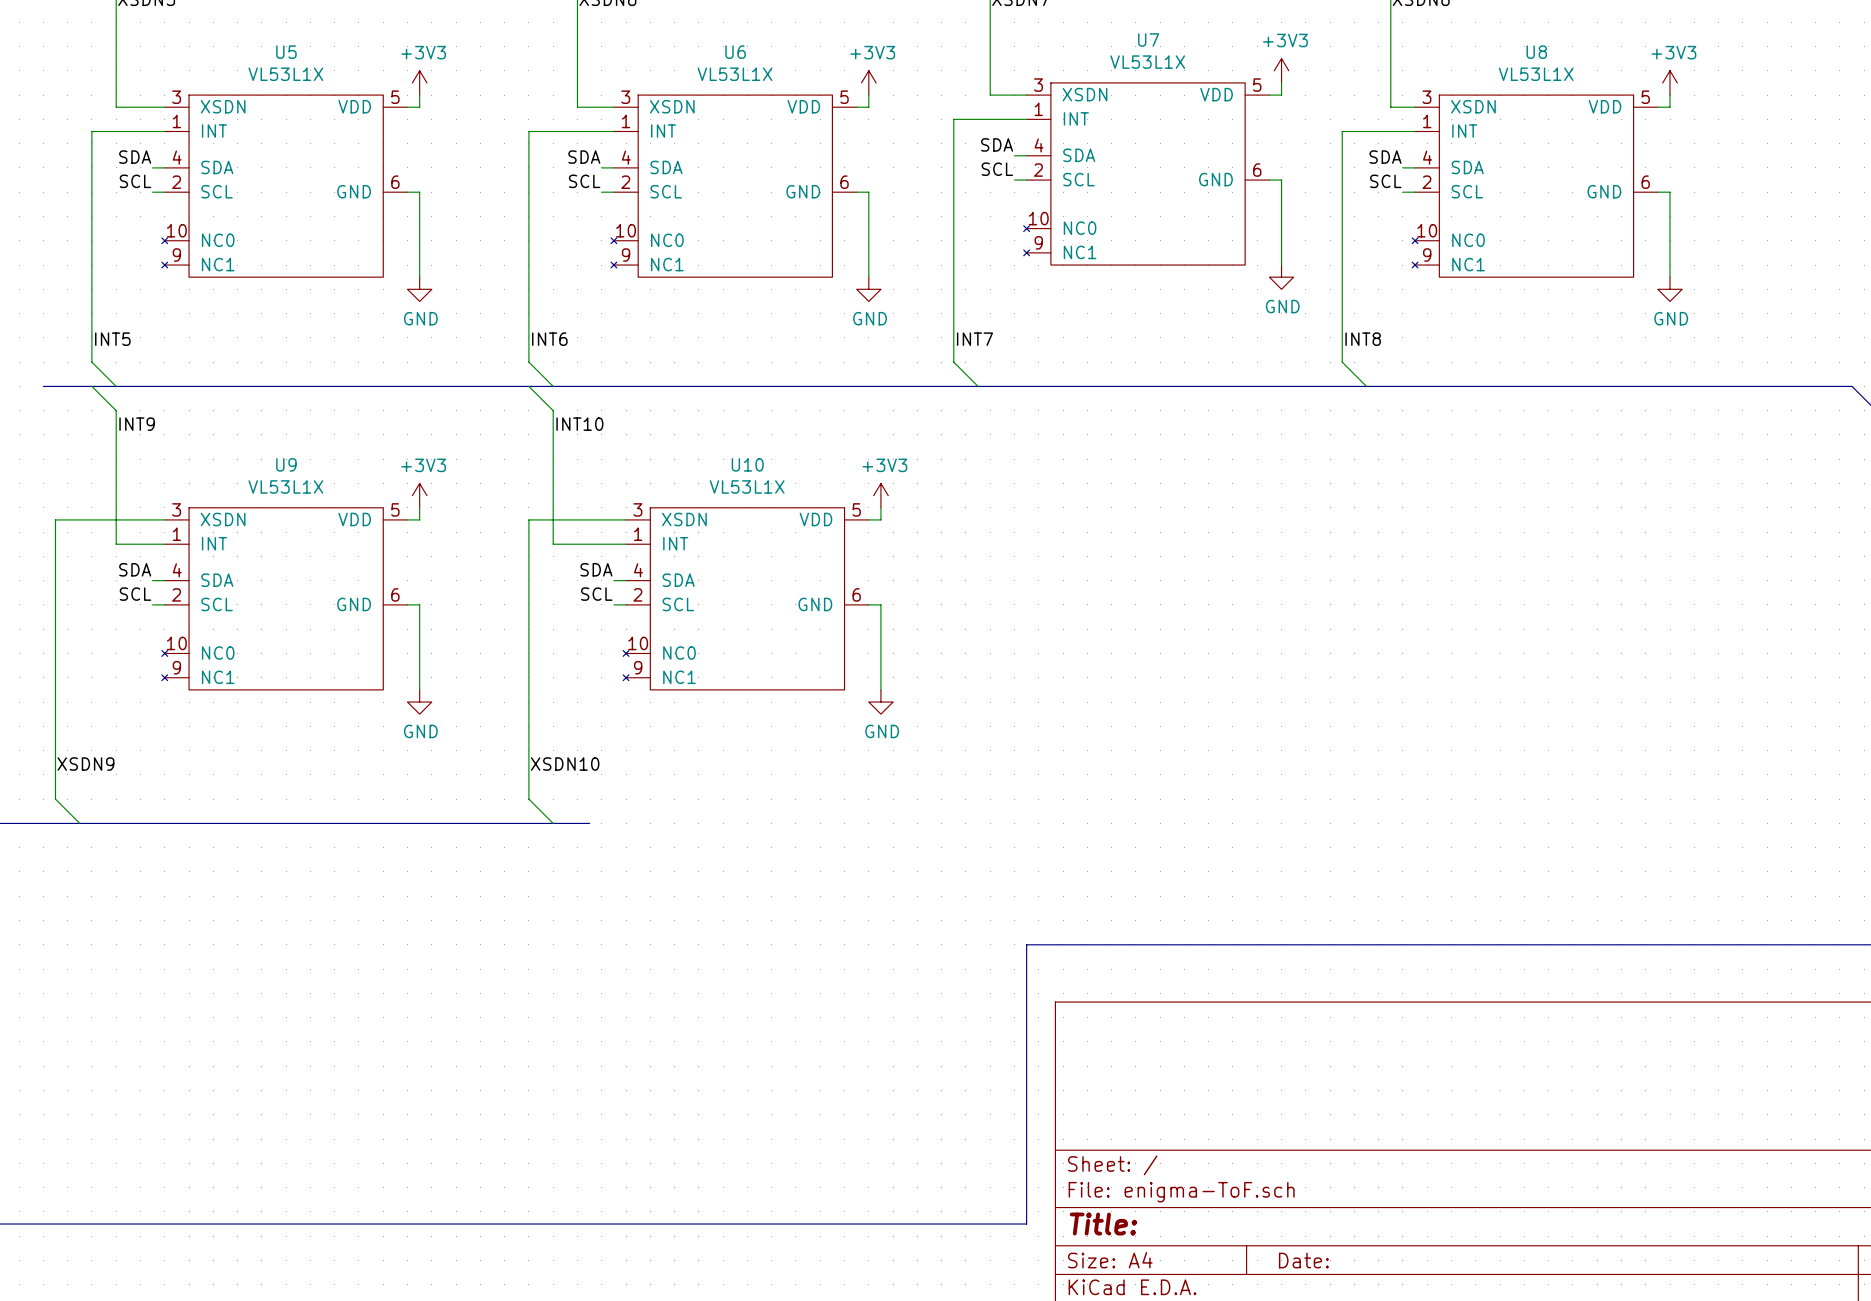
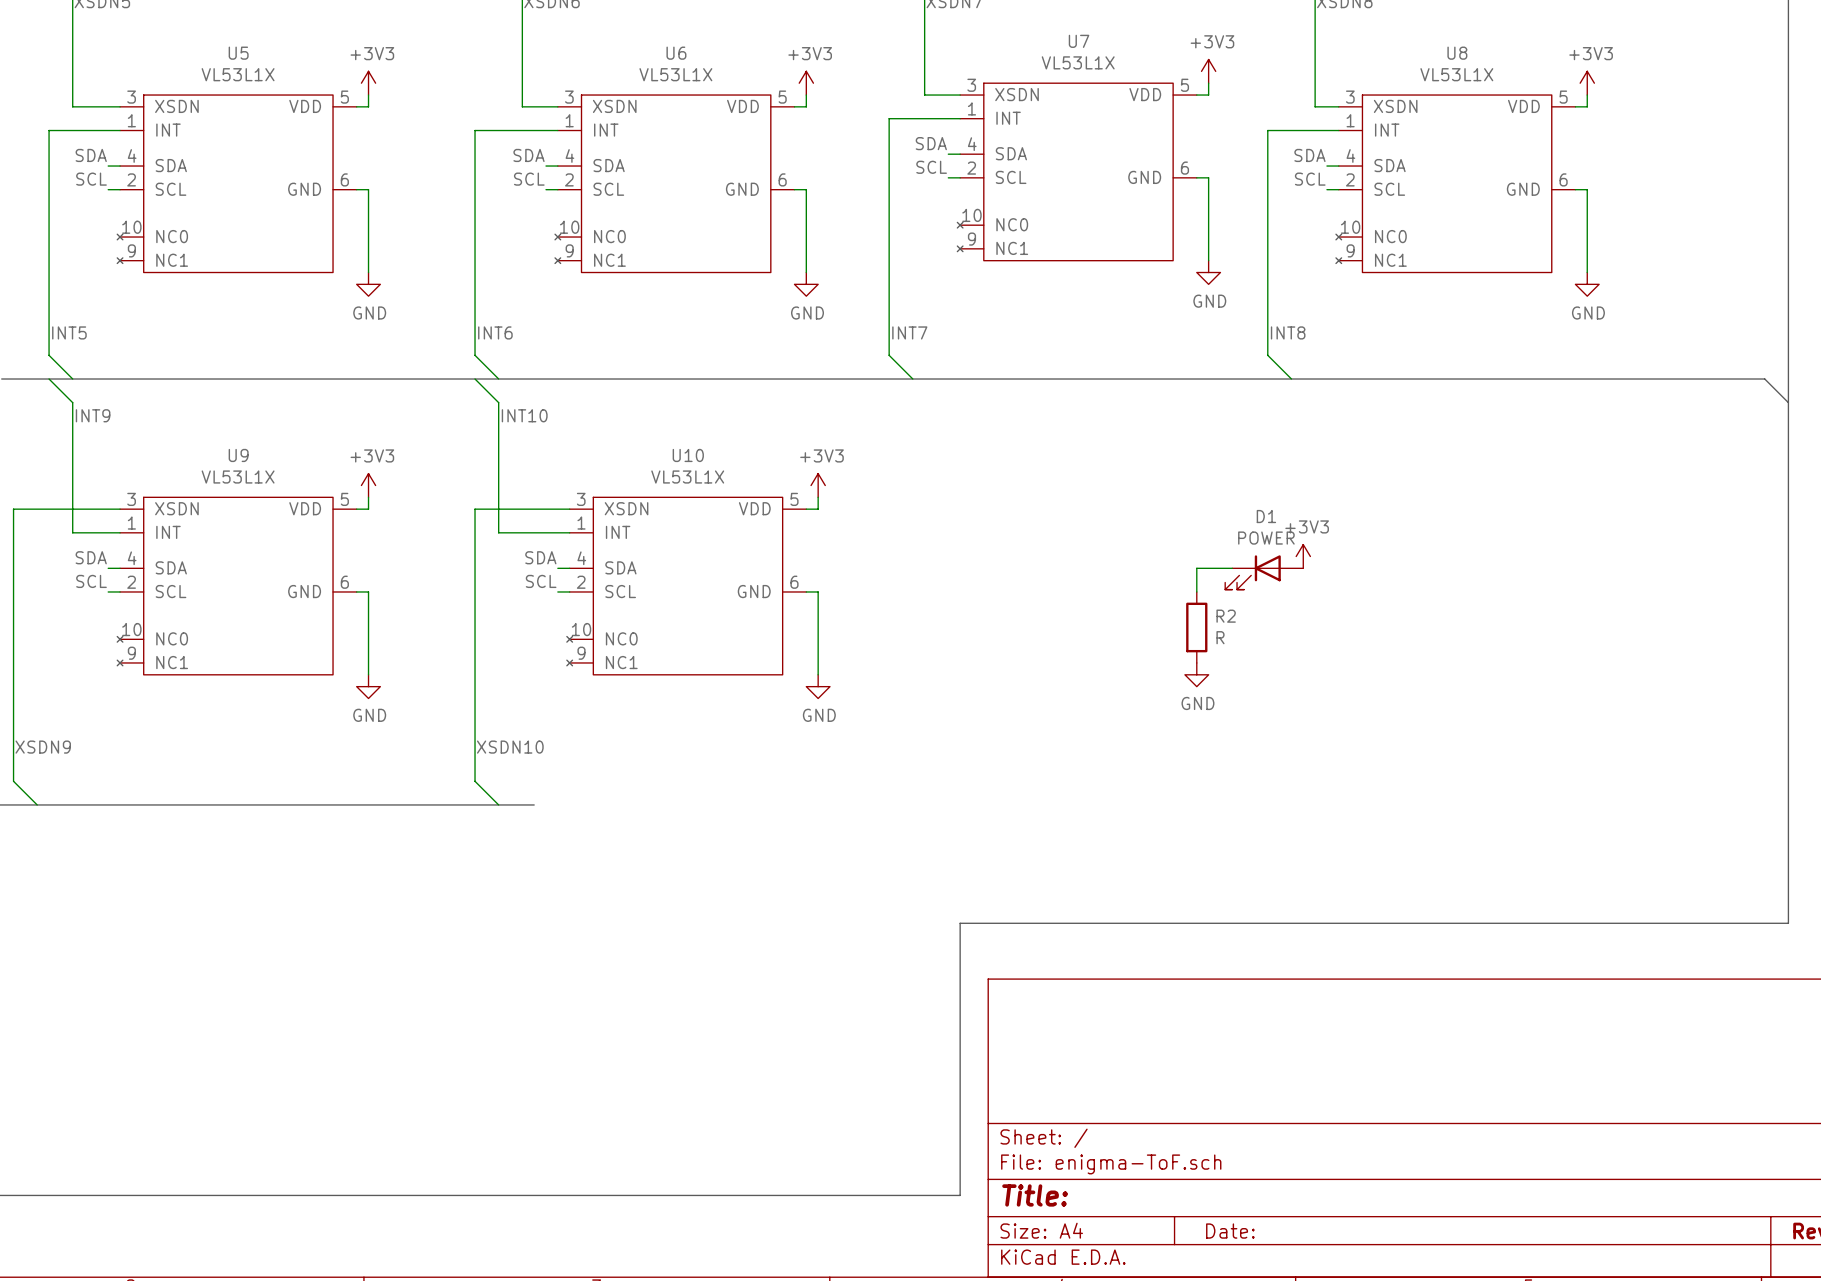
power symbol: none -> +3V3 (1303, 556)
wire: none -> (1232, 568) (1196, 568) (1196, 591)
D1: none -> POWER (1264, 572)
R2: none -> R (1196, 627)
power symbol: none -> GND (1196, 674)

